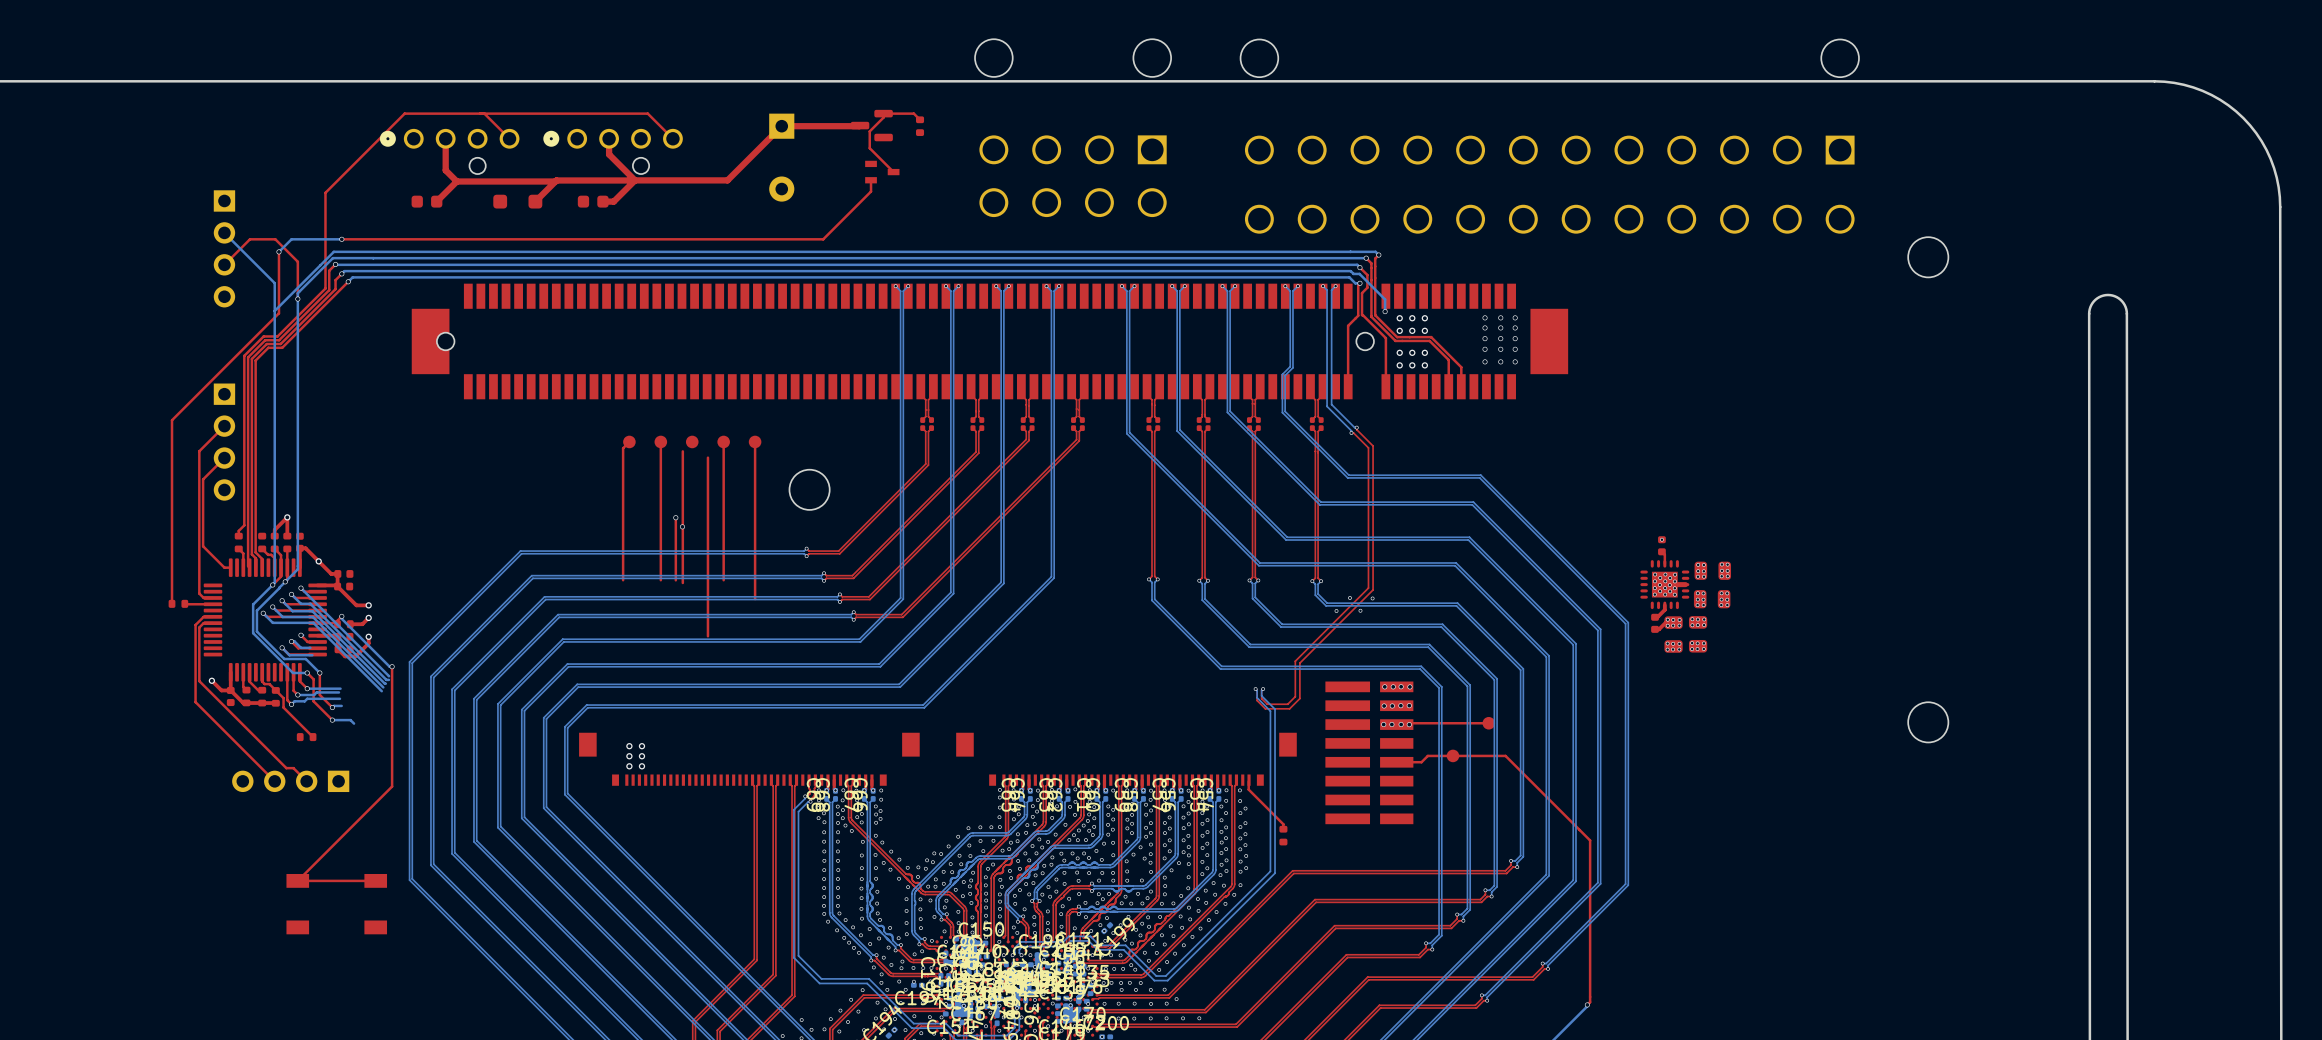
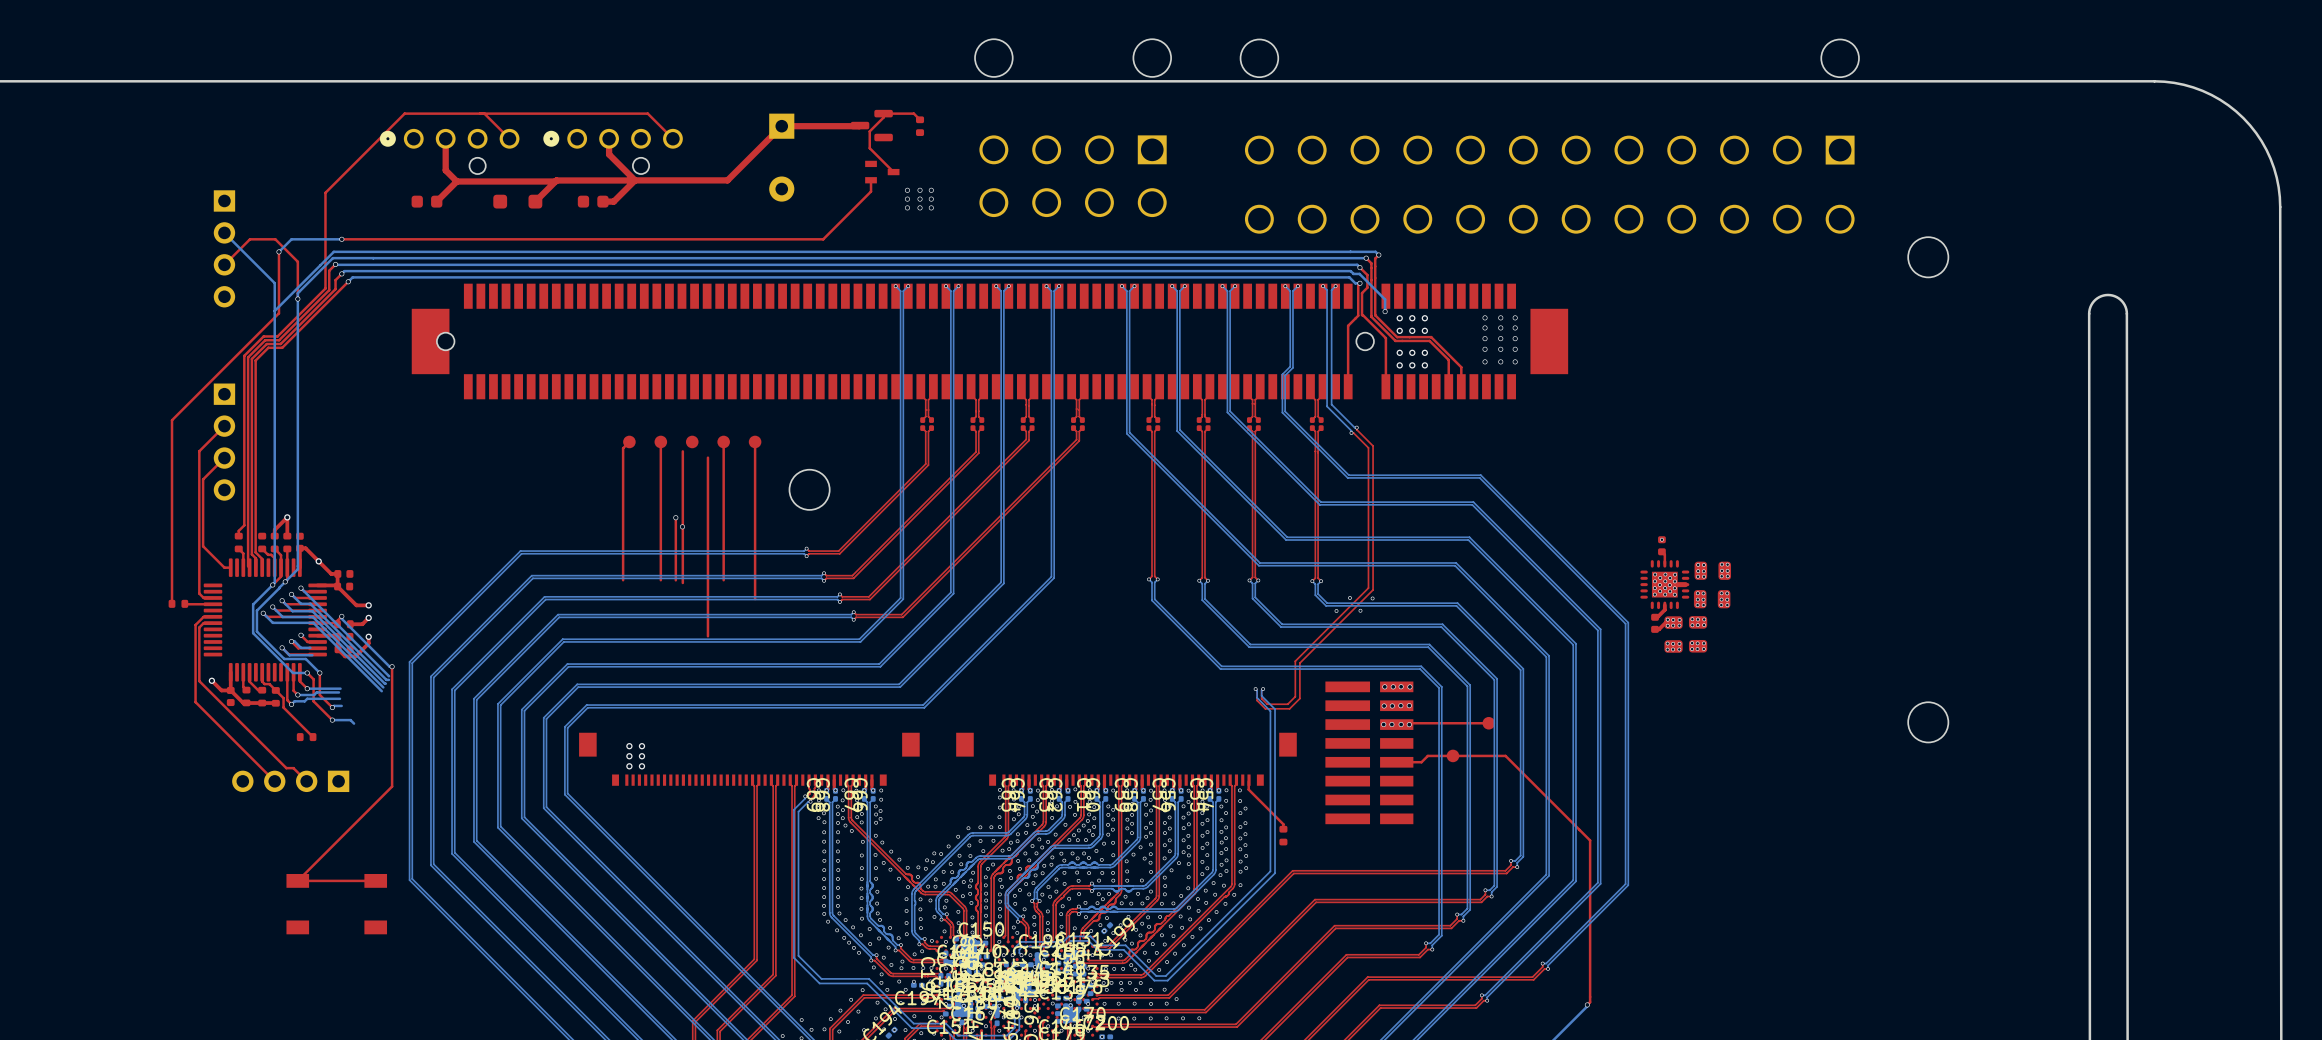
via: none -> (907, 190)
via: none -> (920, 190)
via: none -> (931, 190)
via: none -> (907, 199)
via: none -> (920, 199)
via: none -> (931, 199)
via: none -> (907, 207)
via: none -> (920, 207)
via: none -> (931, 207)

